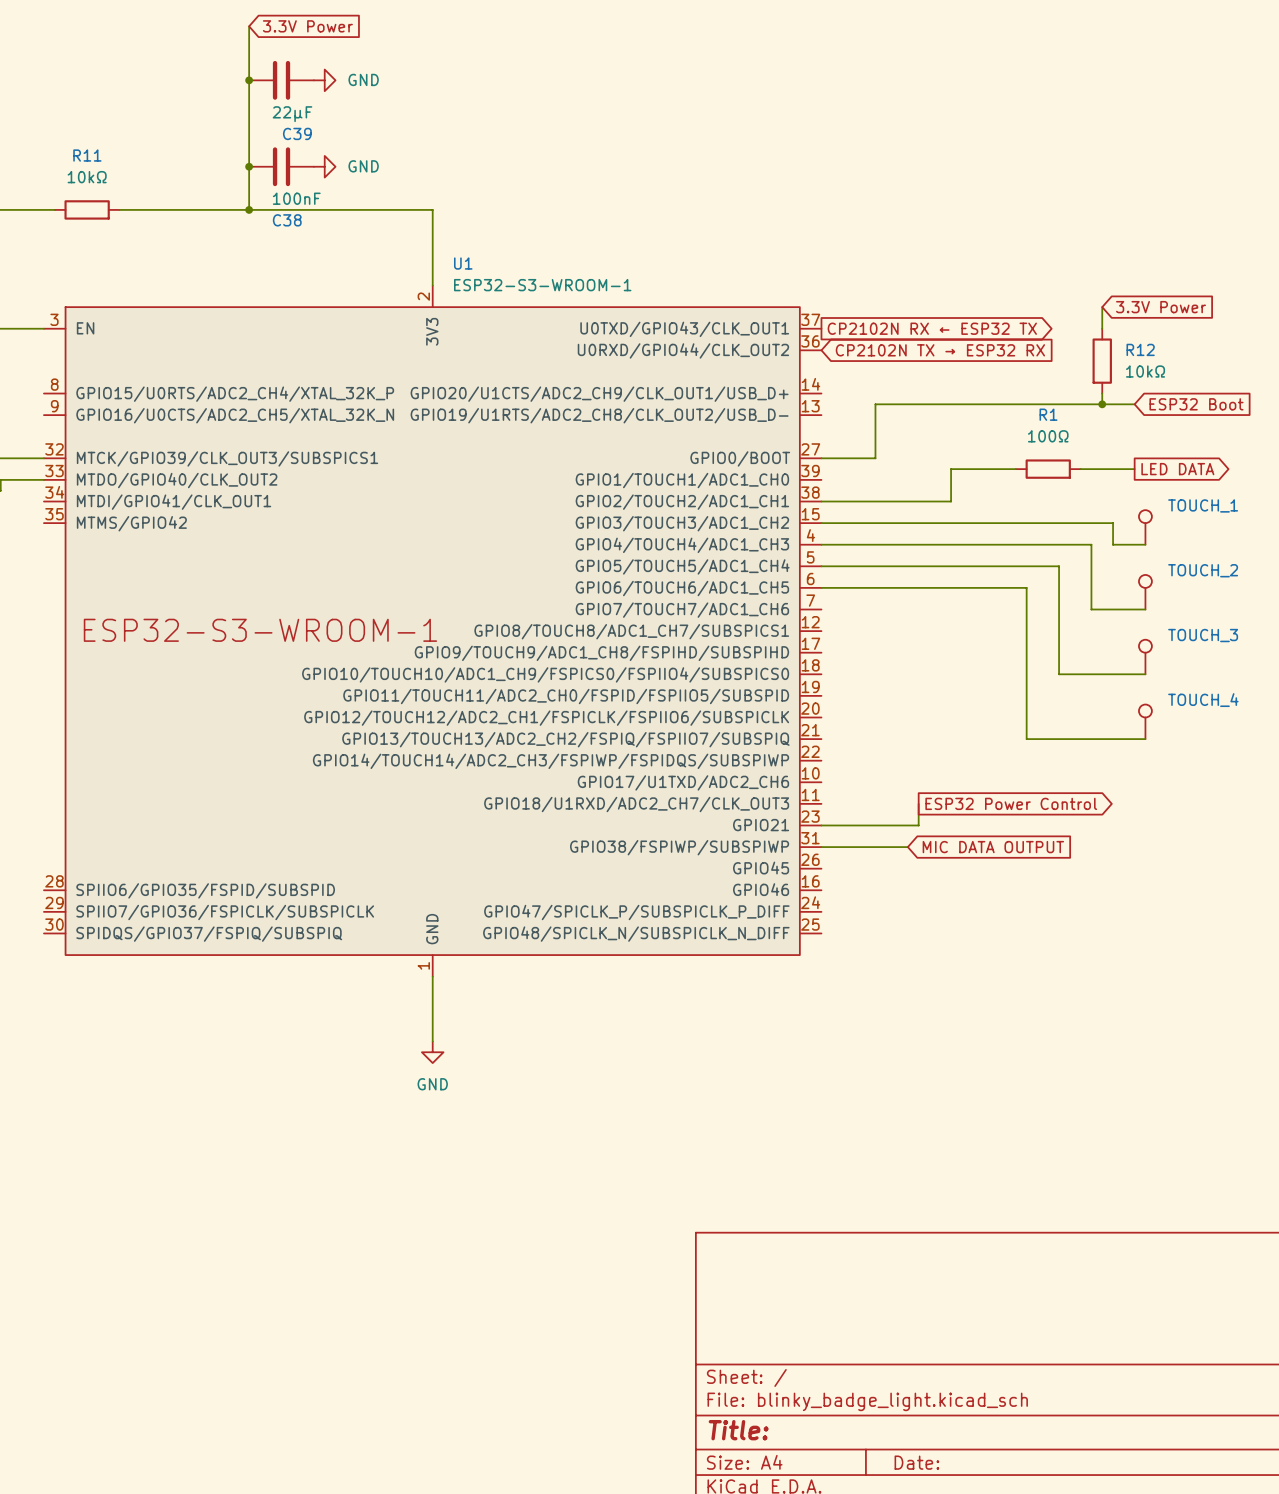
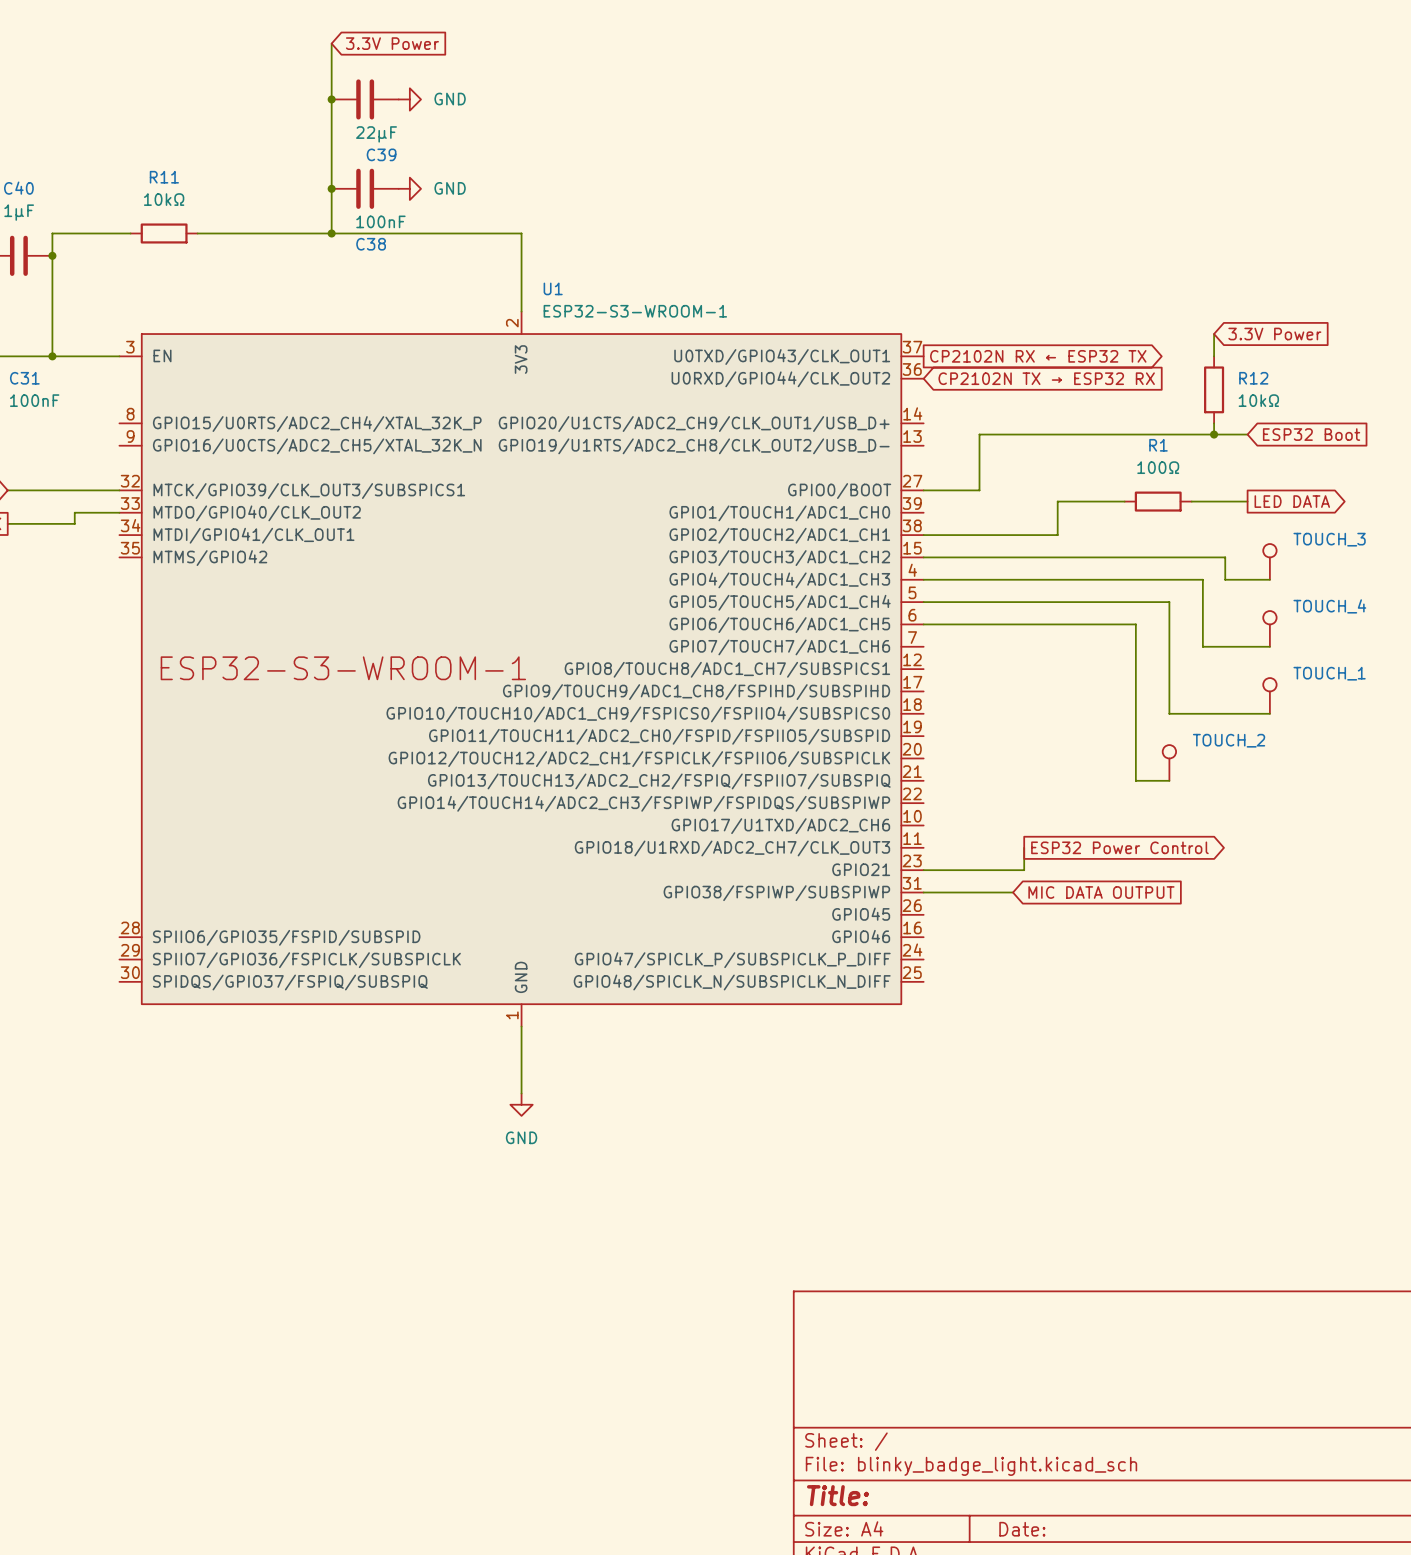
TOUCH_1 position: (1145, 527) -> (1269, 695)
wire: none -> (1258, 579) (1269, 579)
TOUCH_2 position: (1145, 592) -> (1169, 762)
wire: none -> (1258, 646) (1269, 646)
TOUCH_3 position: (1145, 657) -> (1269, 561)
wire: none -> (1258, 713) (1269, 713)
TOUCH_4 position: (1145, 721) -> (1269, 628)
wire: (1059, 739) (1145, 739) -> none

